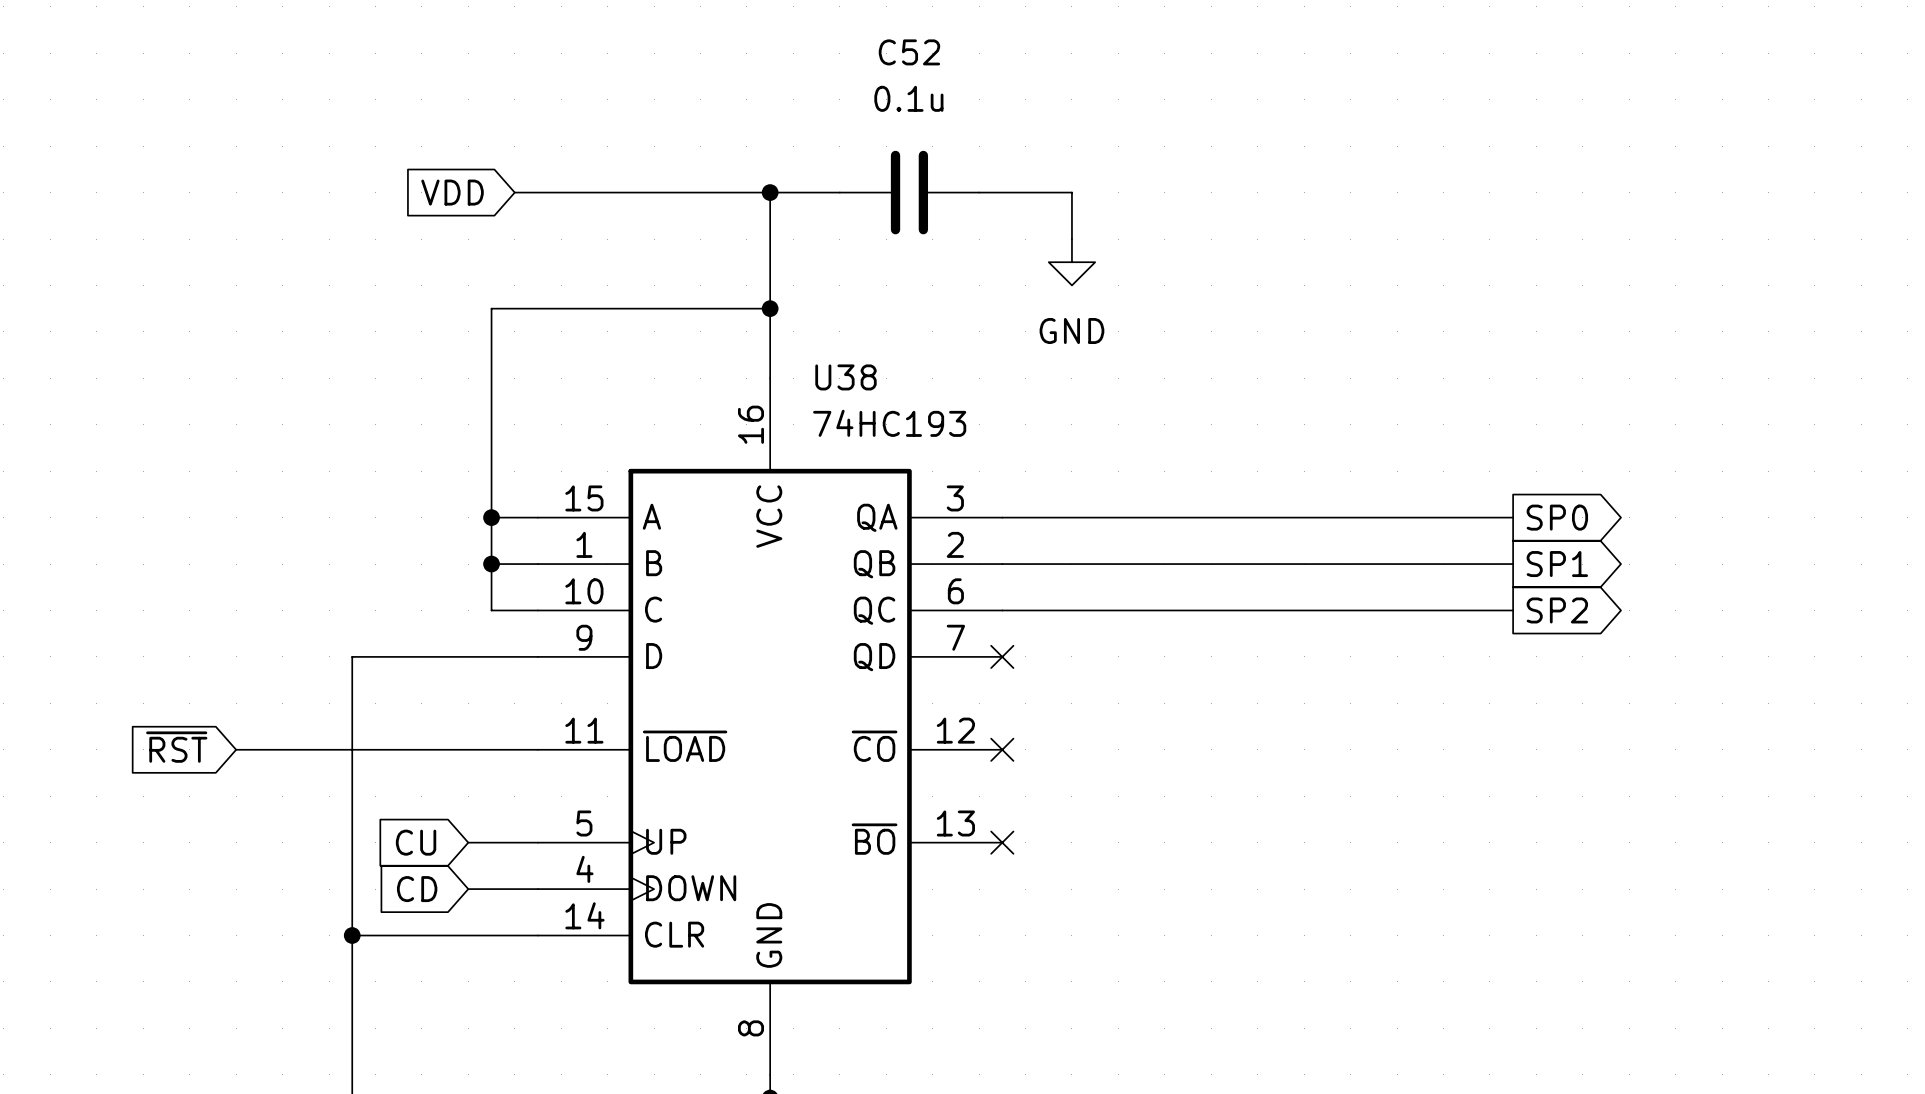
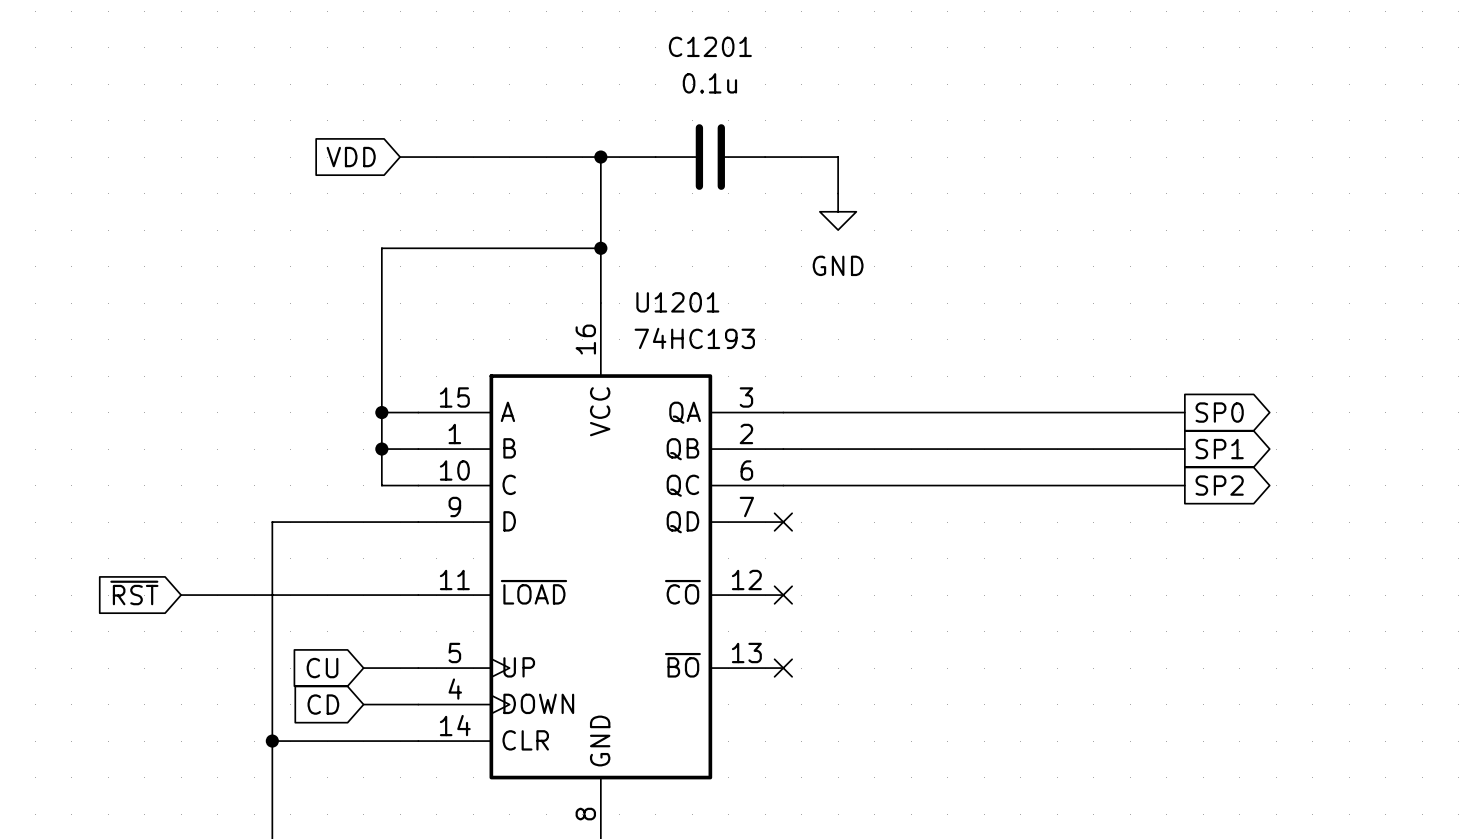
C52 name: C52 (909, 52) -> C1201 (710, 46)
U38 name: U38 (845, 377) -> U1201 (677, 302)

